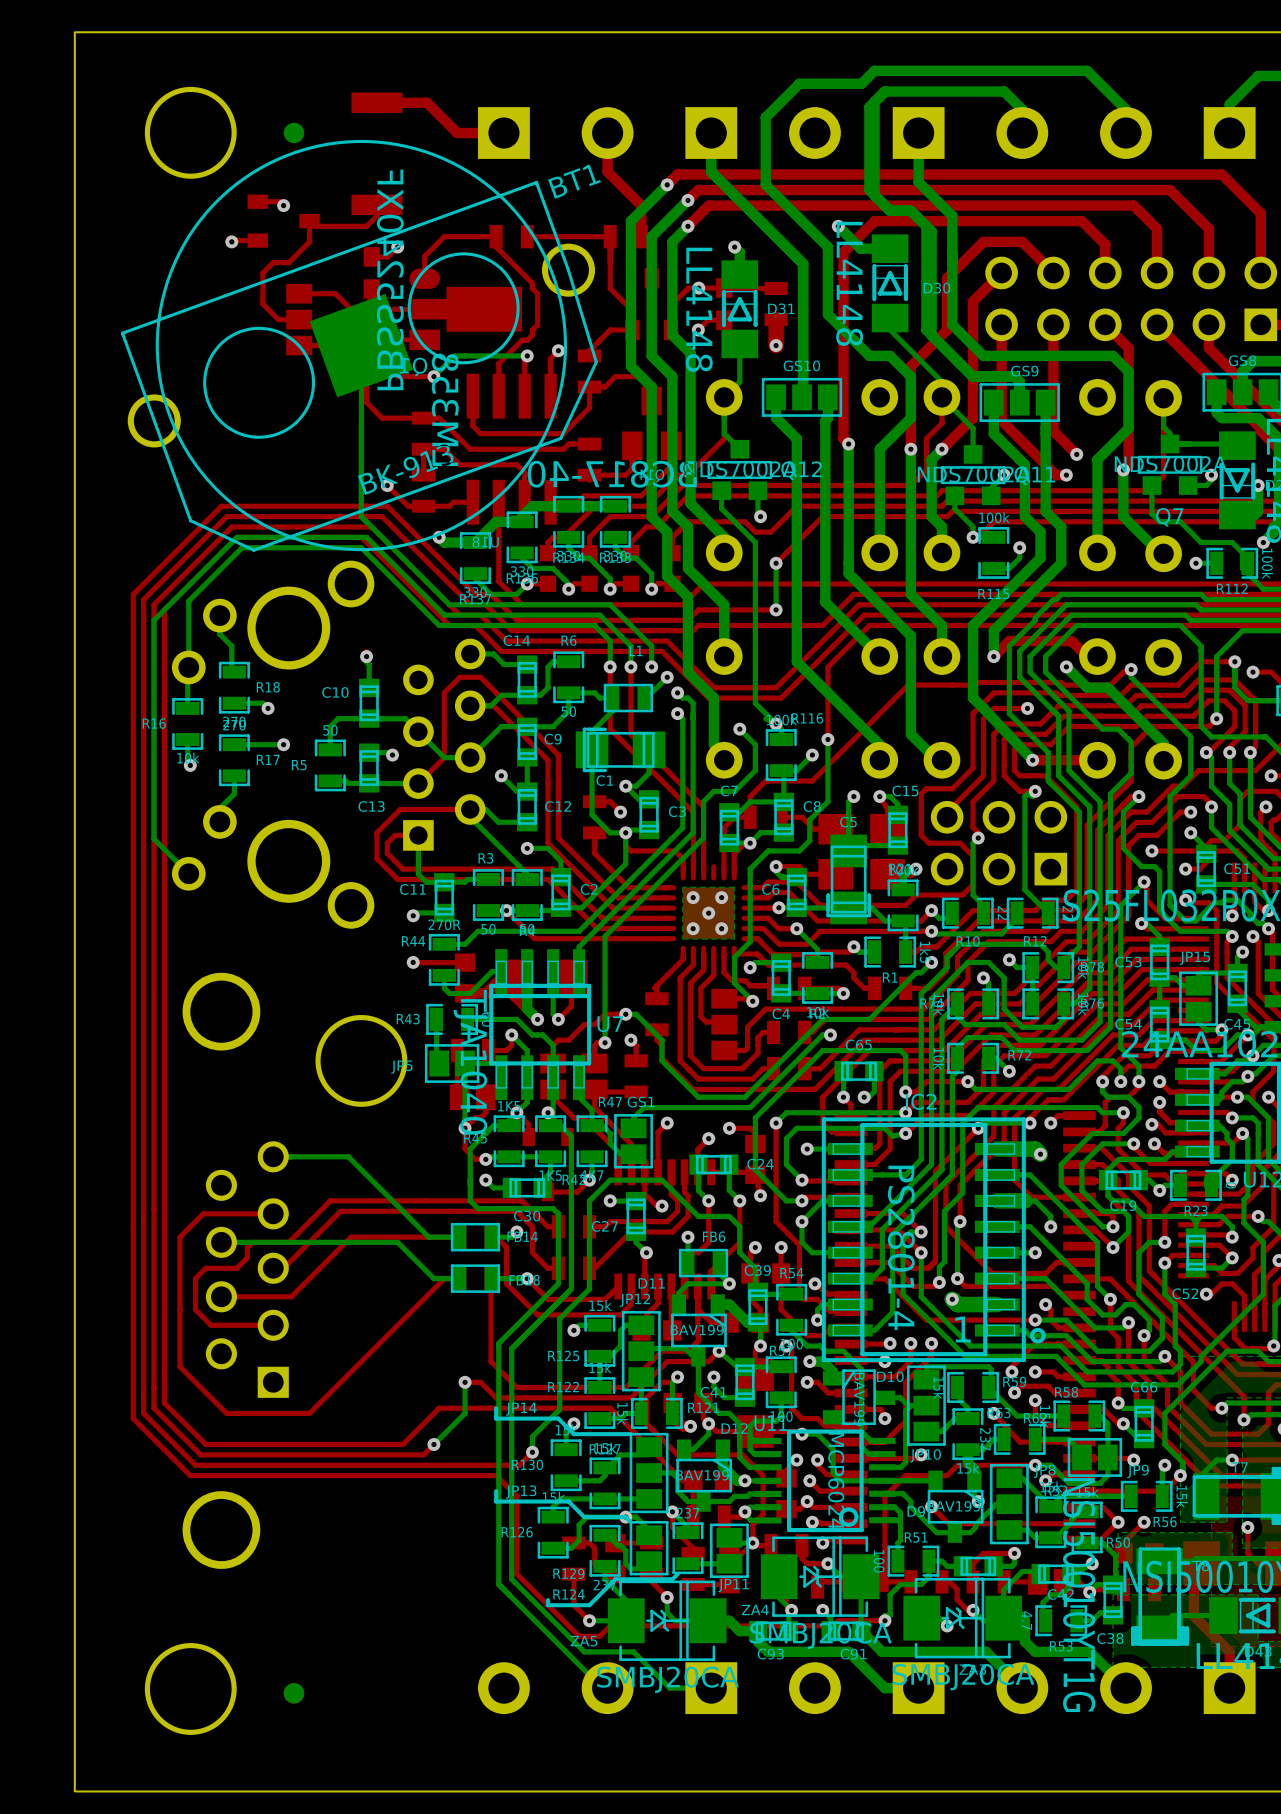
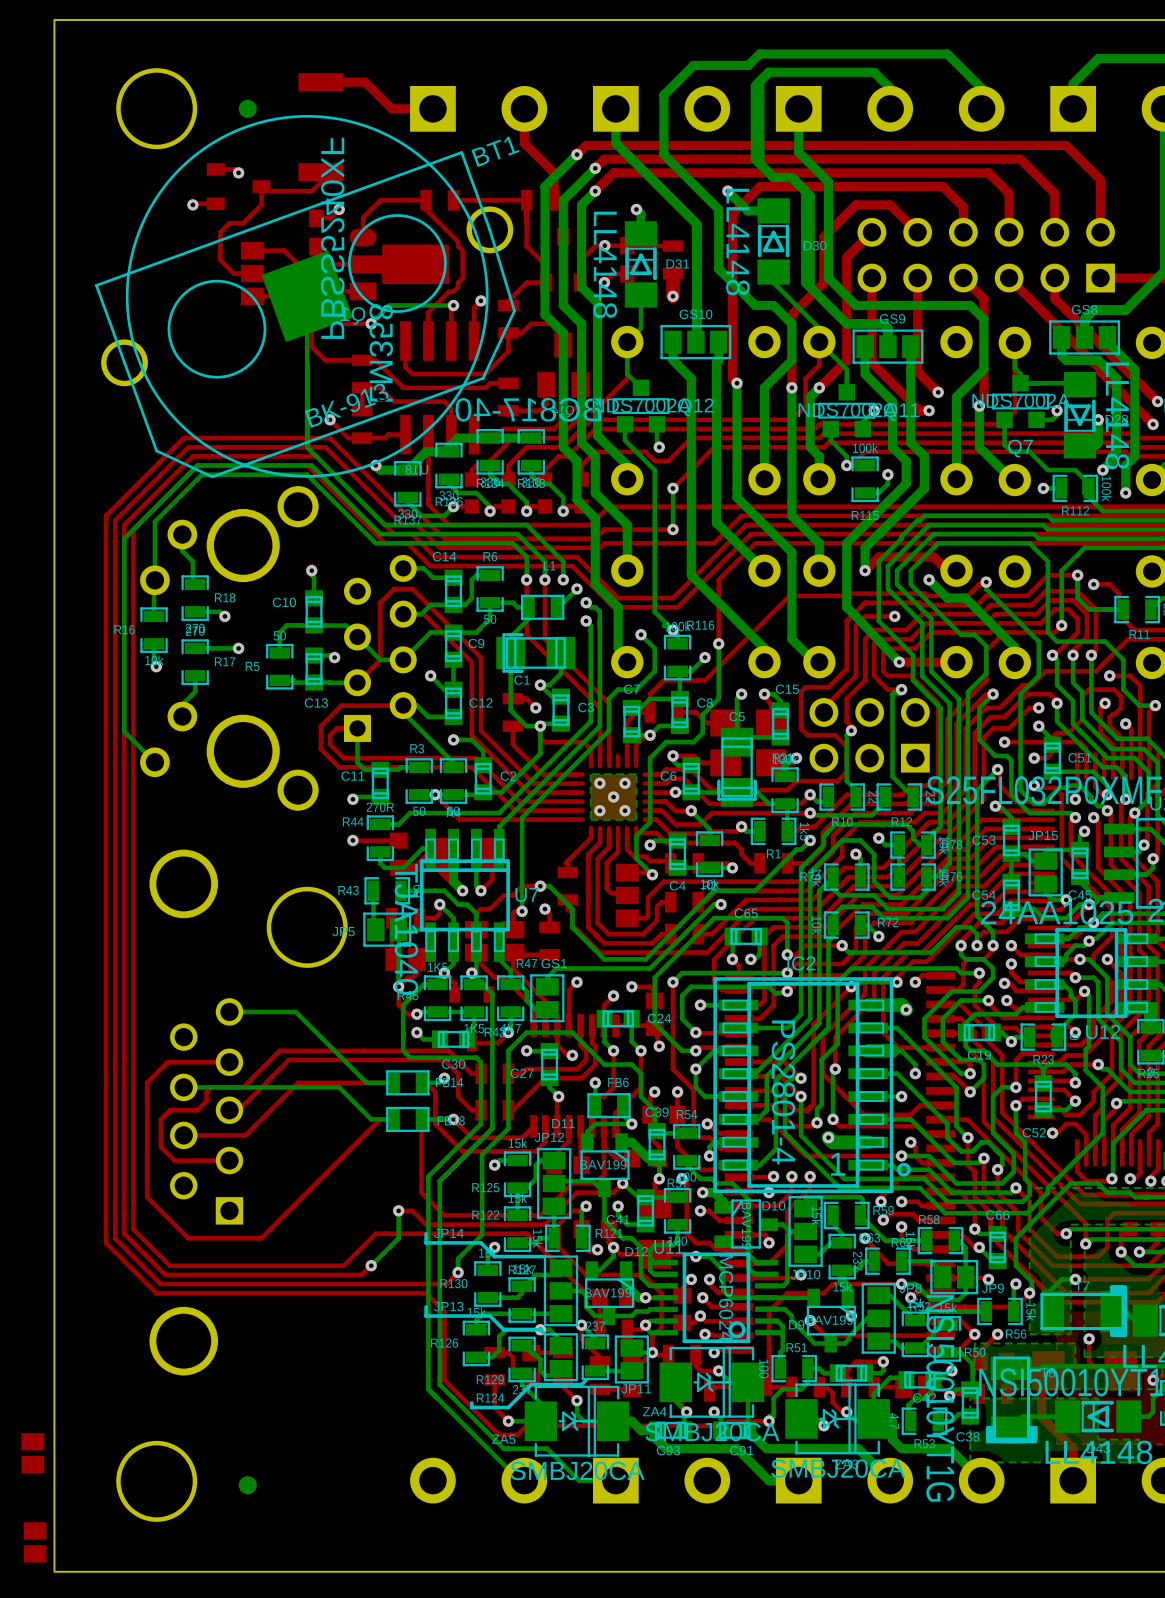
part: none -> (32, 1453)
part: none -> (35, 1542)

